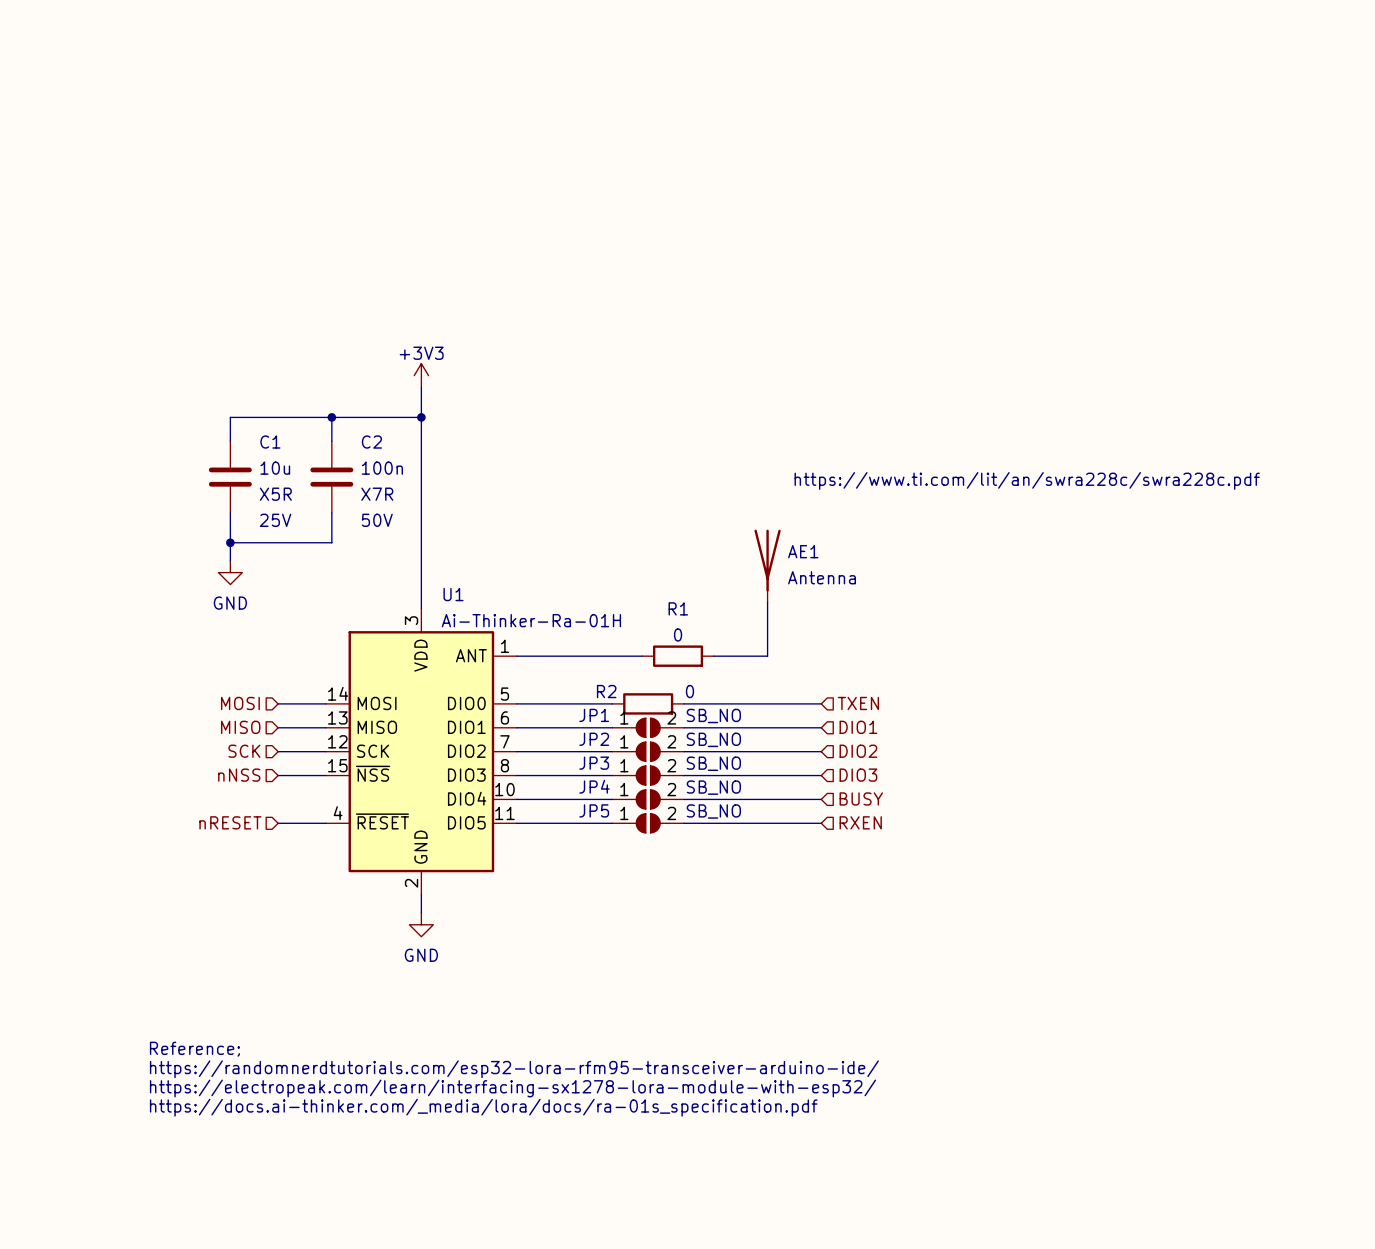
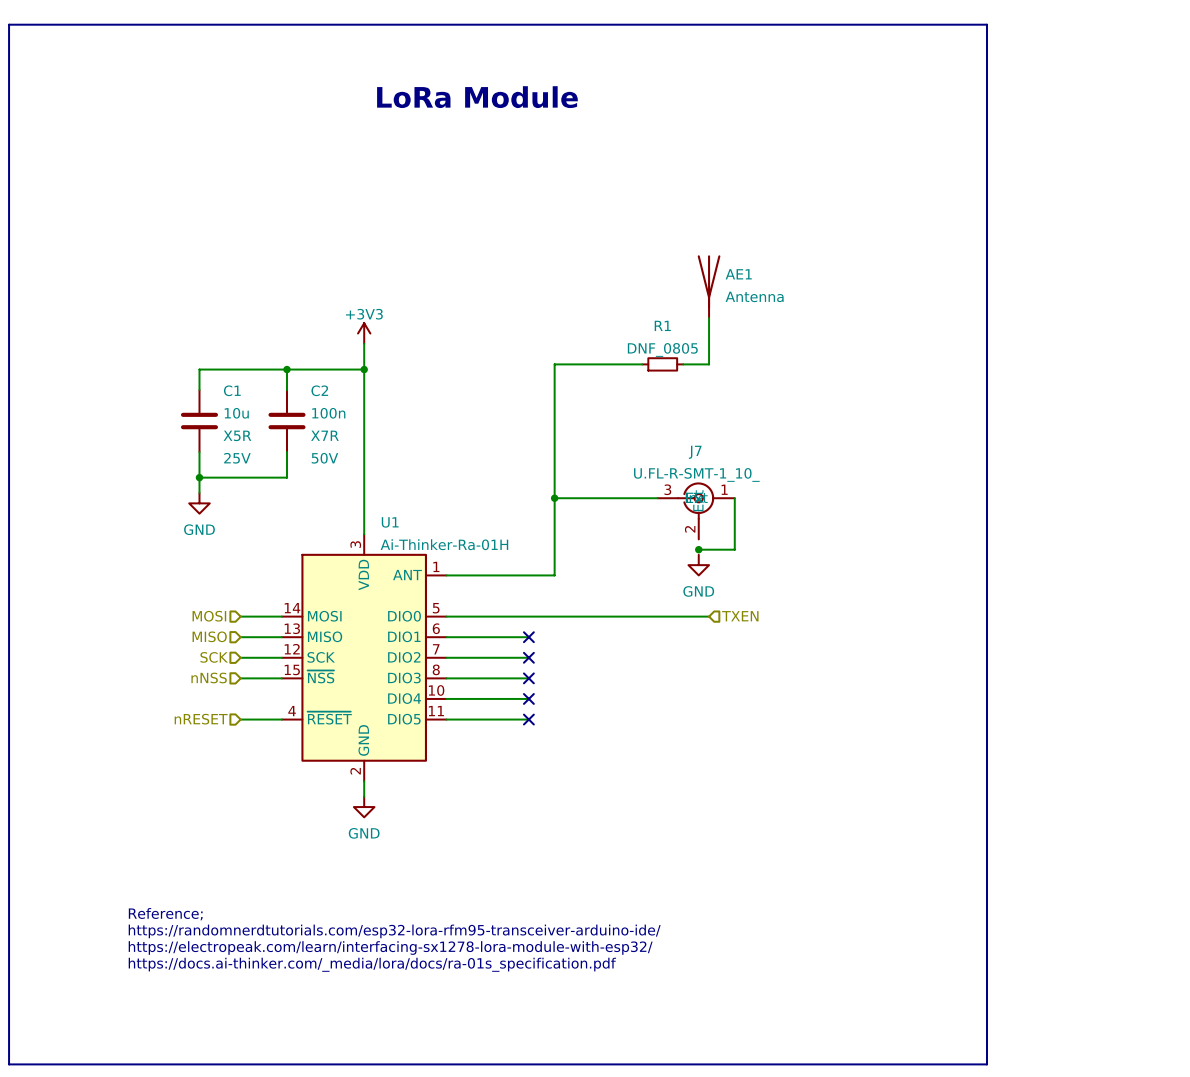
line: none -> (9, 24) (986, 24) (986, 1064) (9, 1064) (9, 24)
text: none -> LoRa Module (477, 97)
wire: none -> (709, 318) (709, 364) (683, 364)
wire: none -> (642, 364) (554, 364) (554, 575)
text: https://www.ti.com/lit/an/swra228c/swra228c.pdf (1027, 480) -> none
wire: none -> (554, 498) (657, 498)
junction: none -> (554, 498)
AE1 position: (767, 566) -> (709, 286)
wire: none -> (734, 498) (734, 549) (698, 549)
J7: none -> U.FL-R-SMT-1_10_ (696, 510)
wire: (767, 602) (767, 656) (713, 656) -> none
junction: none -> (698, 549)
R1 value: 0 (678, 634) -> DNF_0805 (662, 349)
power symbol: none -> GND (698, 565)
R1 symbol: [642, 645, 714, 667] -> [642, 357, 684, 372]
wire: none -> (528, 616) (590, 616)
R2: 0 (648, 703) -> none
no-connect mark: none -> (528, 637)
JP1: SB_NO (648, 727) -> none
wire: (684, 727) (821, 727) -> none
hierarchical label: DIO1 (858, 727) -> none
no-connect mark: none -> (528, 657)
JP2: SB_NO (648, 751) -> none
wire: (684, 751) (821, 751) -> none
hierarchical label: DIO2 (858, 751) -> none
no-connect mark: none -> (528, 678)
JP3: SB_NO (648, 775) -> none
wire: (684, 775) (821, 775) -> none
hierarchical label: DIO3 (858, 775) -> none
hierarchical label: BUSY (861, 798) -> none
no-connect mark: none -> (528, 698)
JP4: SB_NO (648, 799) -> none
wire: (684, 799) (821, 799) -> none
hierarchical label: RXEN (860, 822) -> none
no-connect mark: none -> (528, 719)
JP5: SB_NO (648, 823) -> none
wire: (684, 823) (821, 823) -> none

